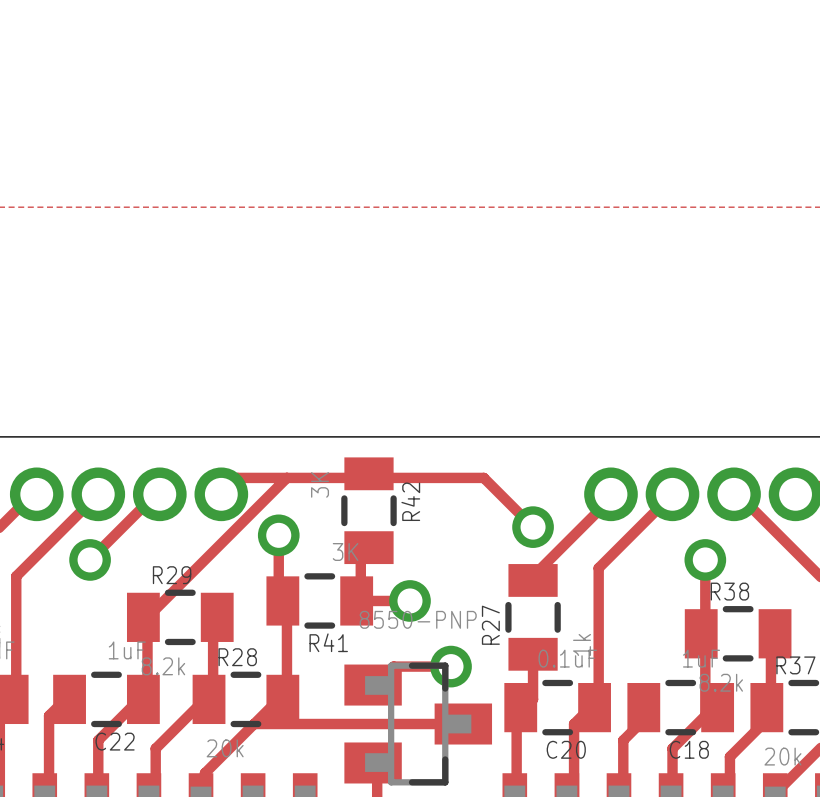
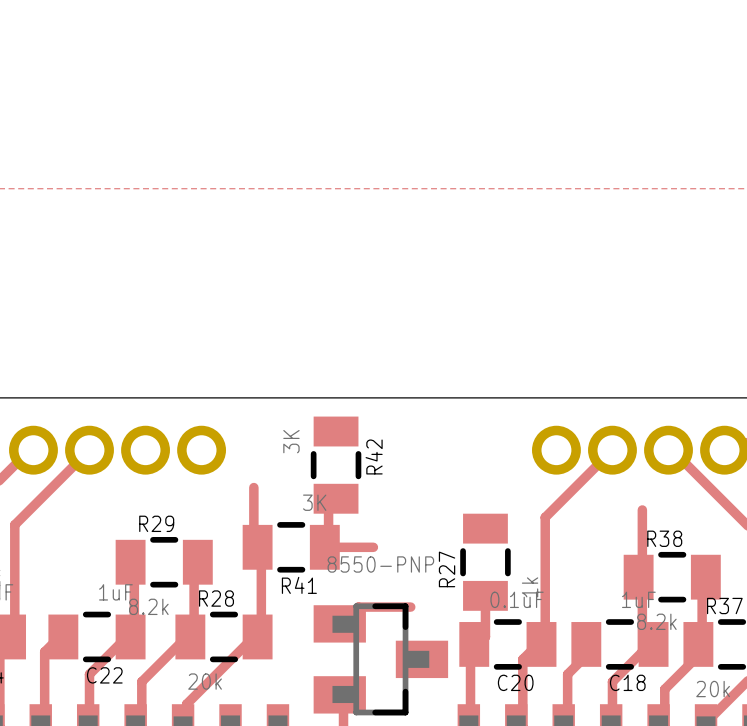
track: (286, 477) (147, 617) (143, 617) -> none
track: (159, 494) (155, 494) (90, 559) -> none
track: (221, 494) (237, 477) (483, 477) (533, 527) -> none
track: (610, 494) (615, 494) (533, 576) (533, 580) -> none
via: (533, 527) -> none
via: (278, 535) -> none
via: (90, 559) -> none
via: (705, 559) -> none
via: (410, 600) -> none
via: (451, 666) -> none
track: (254, 724) (463, 724) -> none

